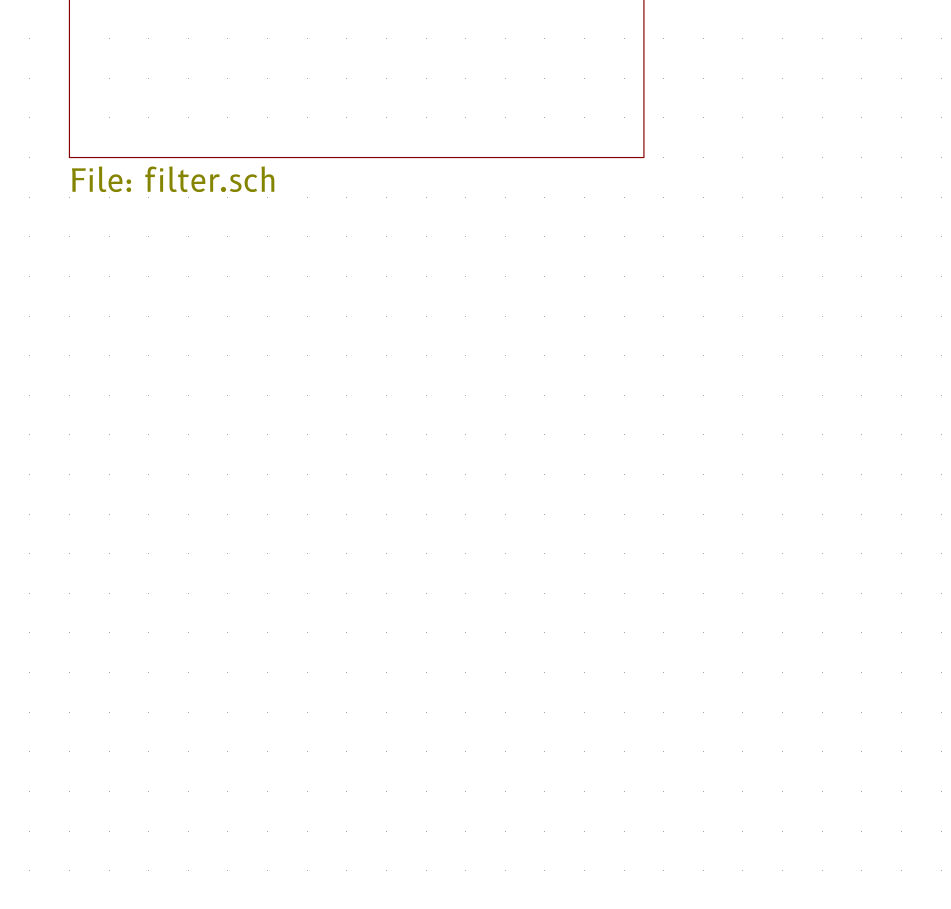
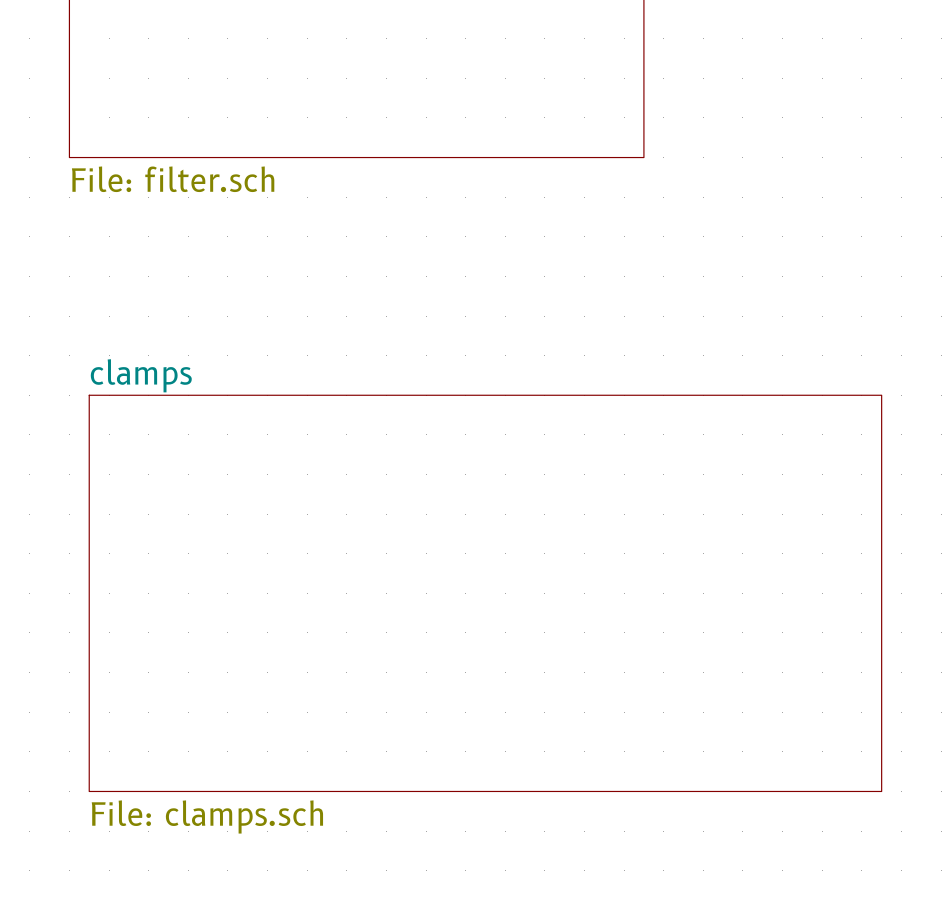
sheet clamps: none -> File: clamps.sch (485, 593)

